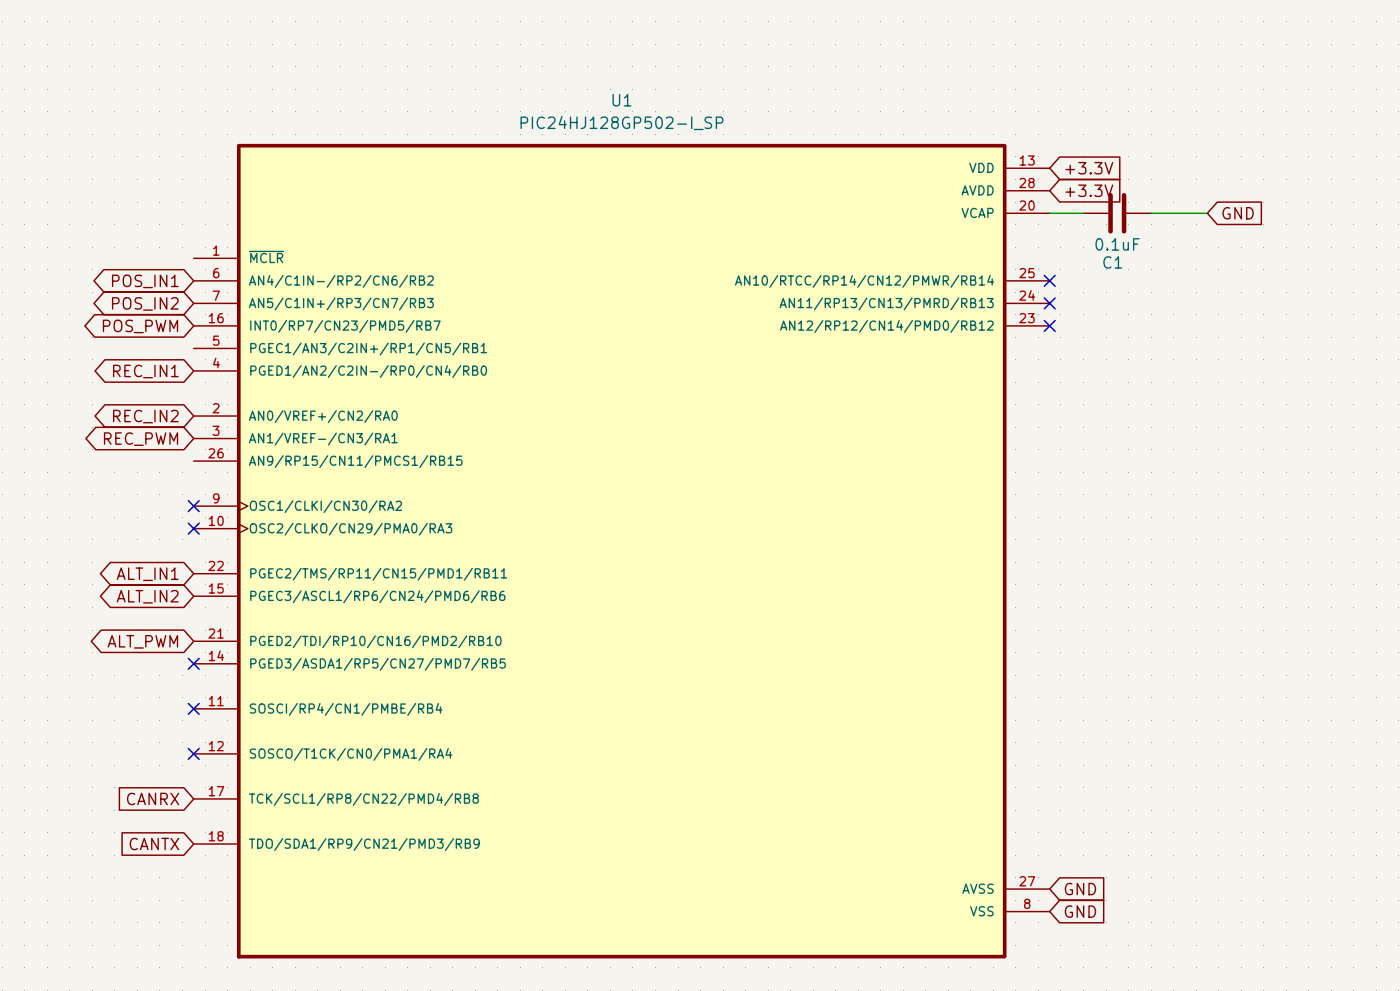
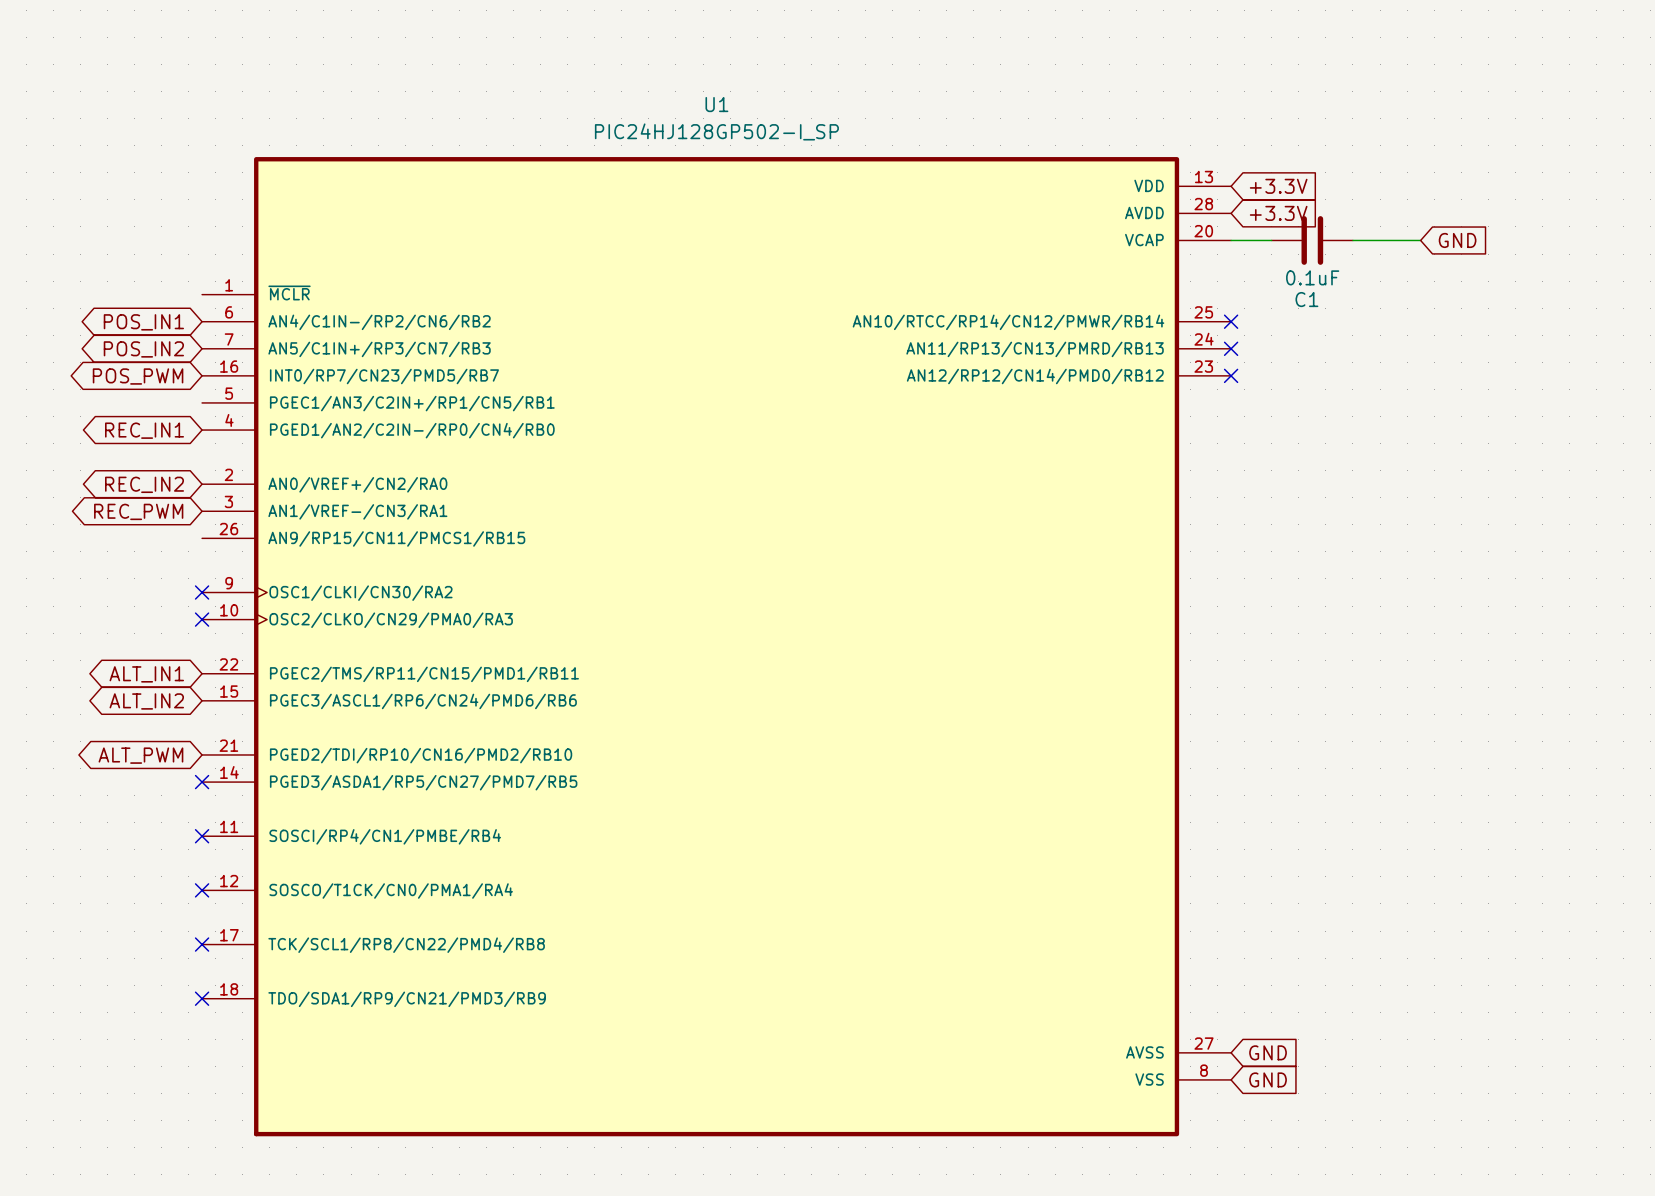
global label: CANRX (153, 798) -> none
no-connect mark: none -> (202, 944)
global label: CANTX (154, 844) -> none
no-connect mark: none -> (202, 998)

